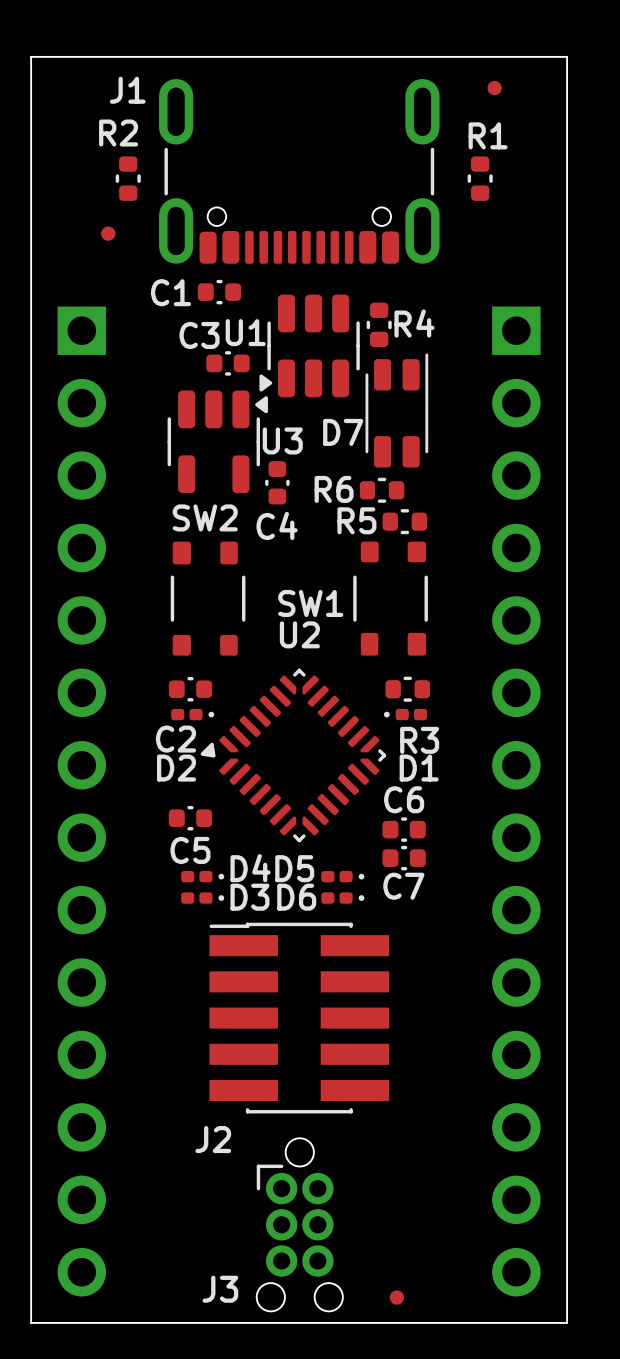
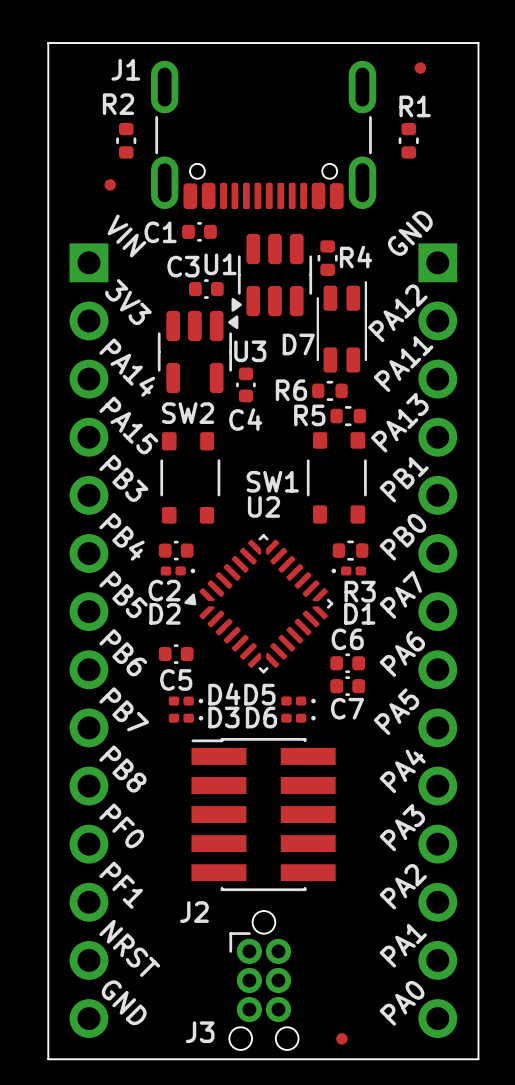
text: none -> GND (410, 233)
text: none -> VIN (126, 235)
text: none -> 3V3 (128, 302)
text: none -> PA12 (397, 313)
text: none -> PA11 (403, 364)
text: none -> PA14 (127, 367)
text: none -> PA13 (399, 422)
text: none -> PA15 (128, 425)
text: none -> PB3 (123, 478)
text: none -> PB1 (404, 479)
text: none -> PB4 (122, 536)
text: none -> PB0 (403, 537)
text: none -> PB5 (123, 594)
text: none -> PA7 (400, 594)
text: none -> PB6 (123, 652)
text: none -> PA6 (402, 653)
text: none -> PB7 (124, 709)
text: none -> PA5 (396, 711)
text: none -> PB8 (122, 769)
text: none -> PA4 (402, 771)
text: none -> PF0 (121, 825)
text: none -> PA3 (402, 827)
text: none -> PF1 (121, 885)
text: none -> PA2 (403, 886)
text: none -> PA1 (403, 945)
text: none -> NRST (129, 948)
text: none -> GND (124, 1002)
text: none -> PA0 (402, 1003)

